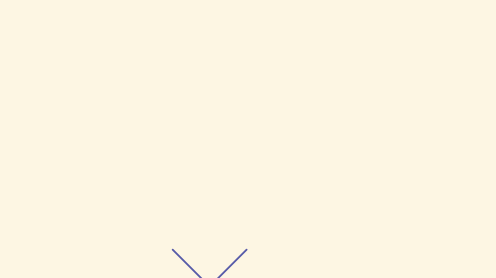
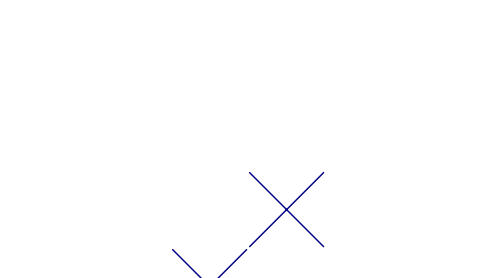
no-connect mark: none -> (286, 209)

